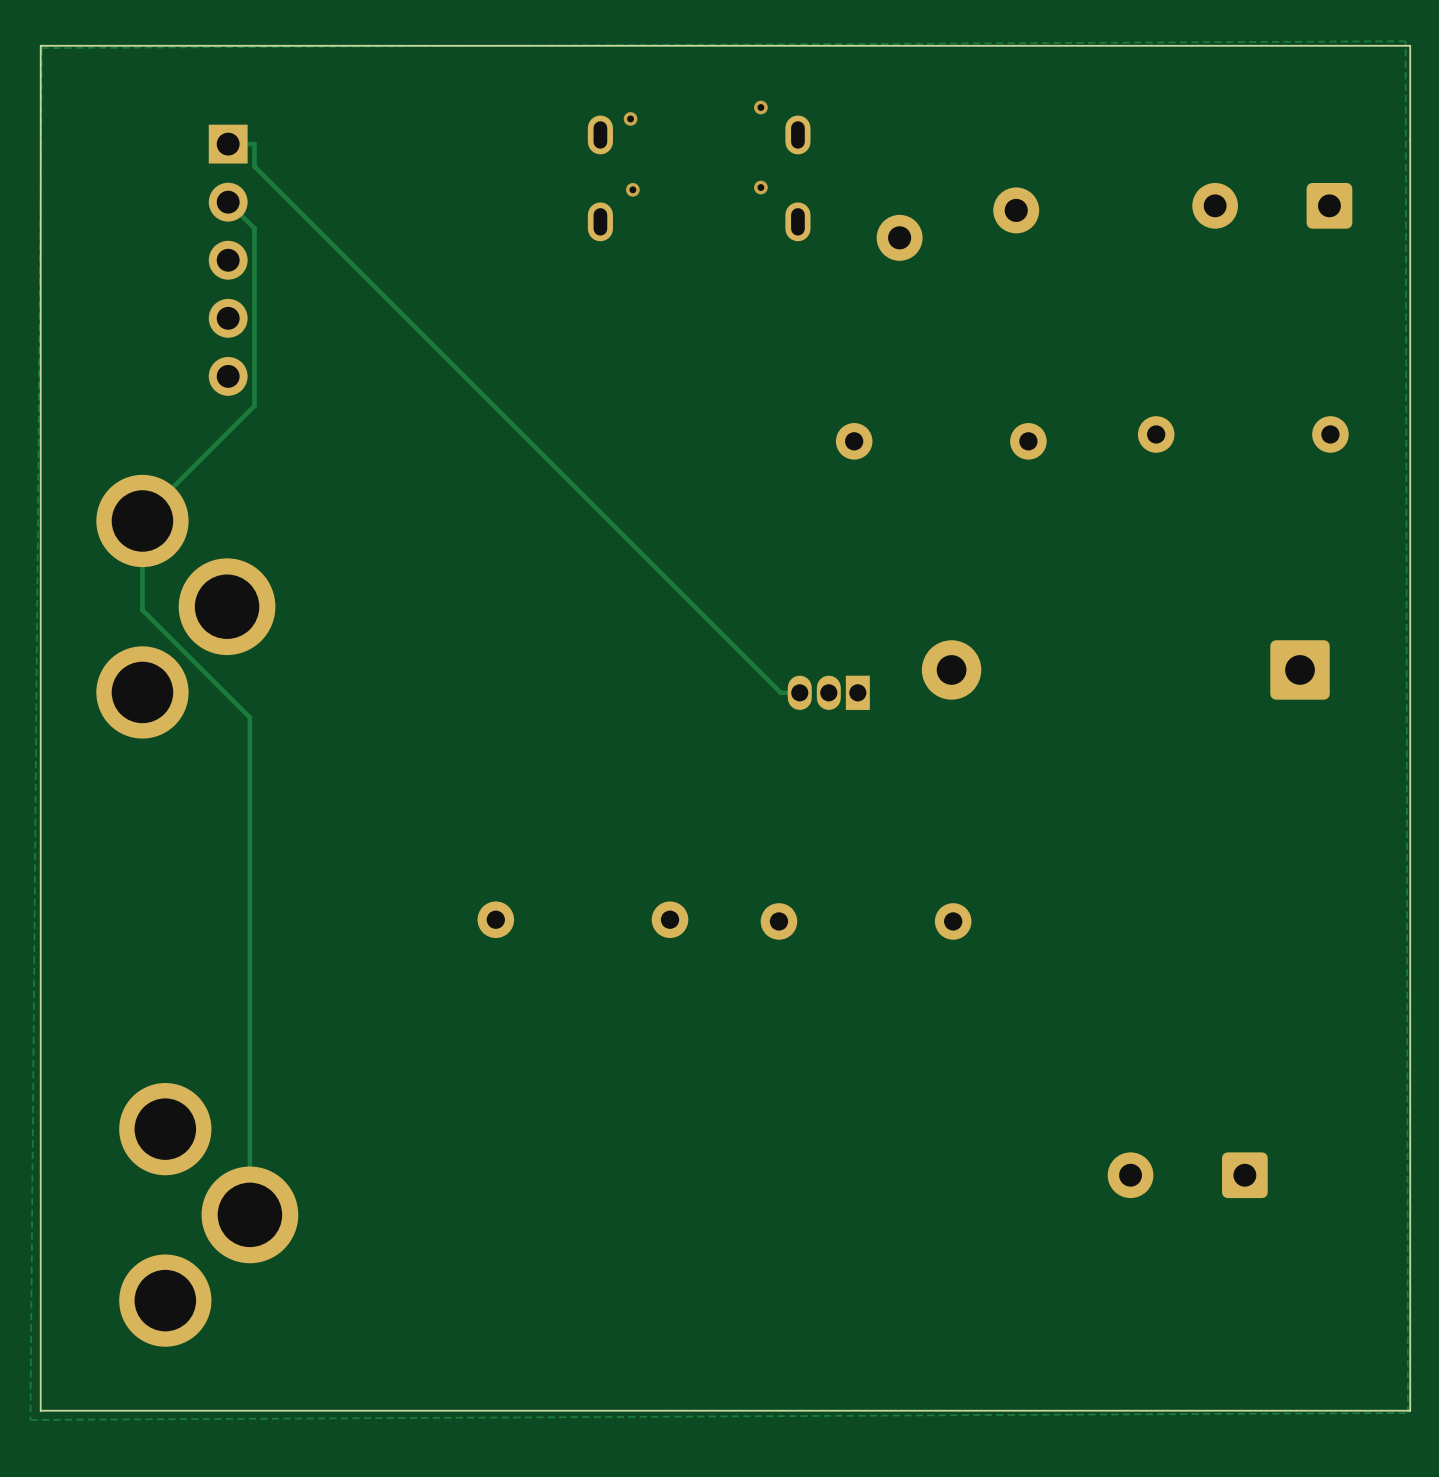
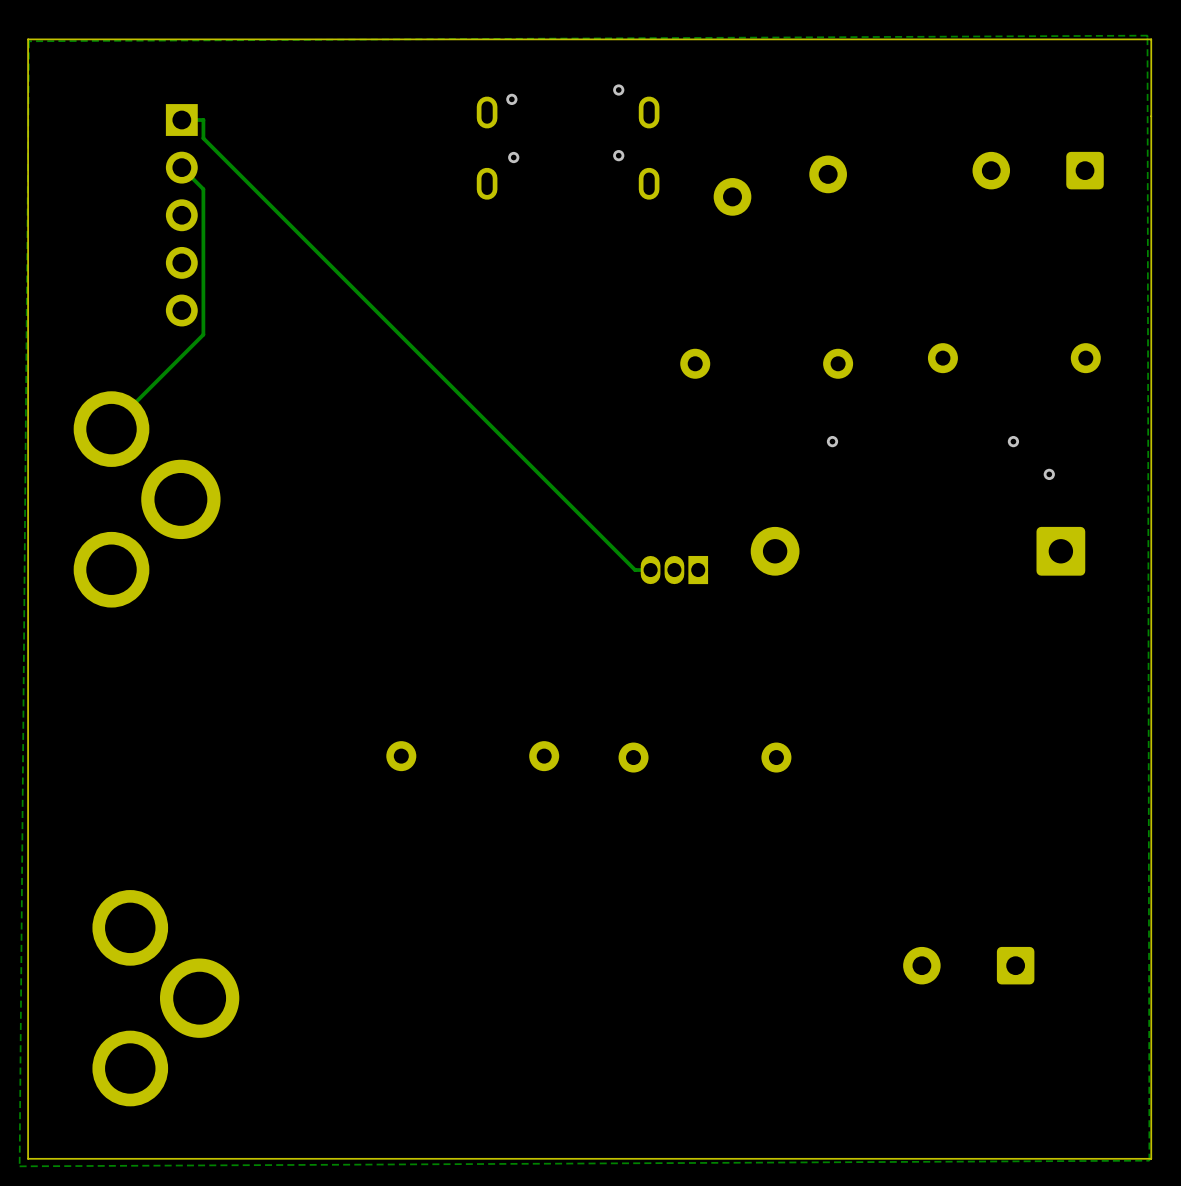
track: (142, 520) (142, 610) (249, 717) (249, 1210) -> none
via: none -> (832, 441)
via: none -> (1013, 441)
via: none -> (1049, 474)

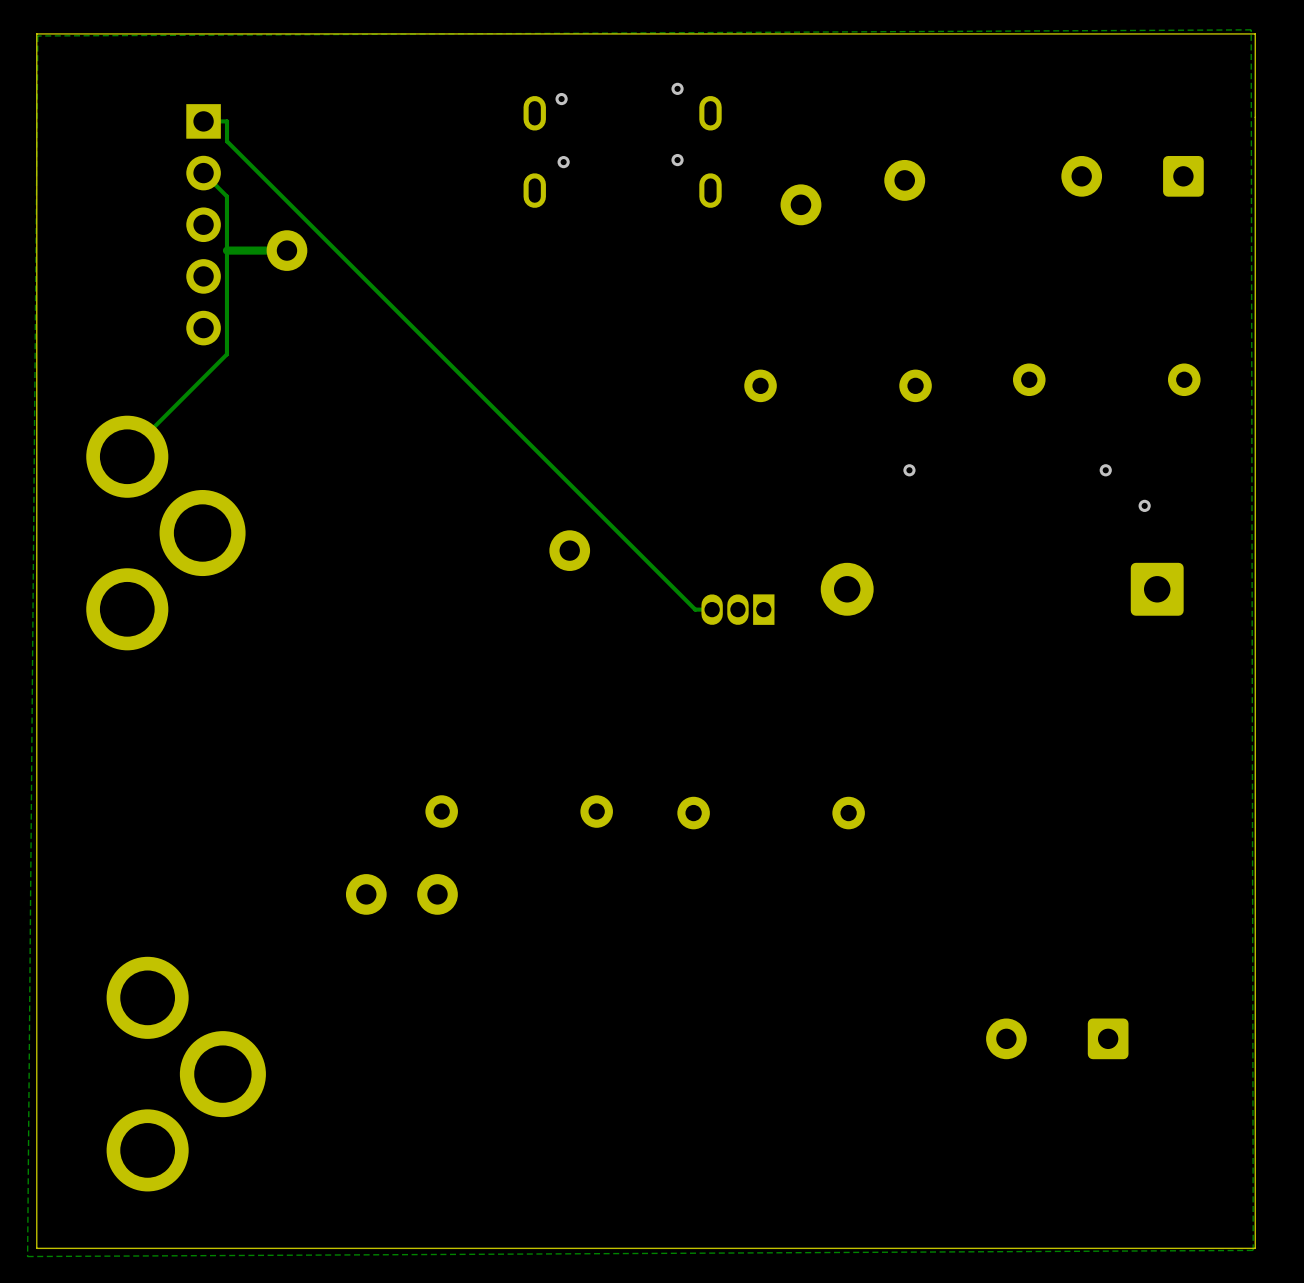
track: none -> (286, 250) (226, 250)
part: none -> (286, 250)
part: none -> (569, 550)
part: none -> (366, 894)
part: none -> (437, 894)

